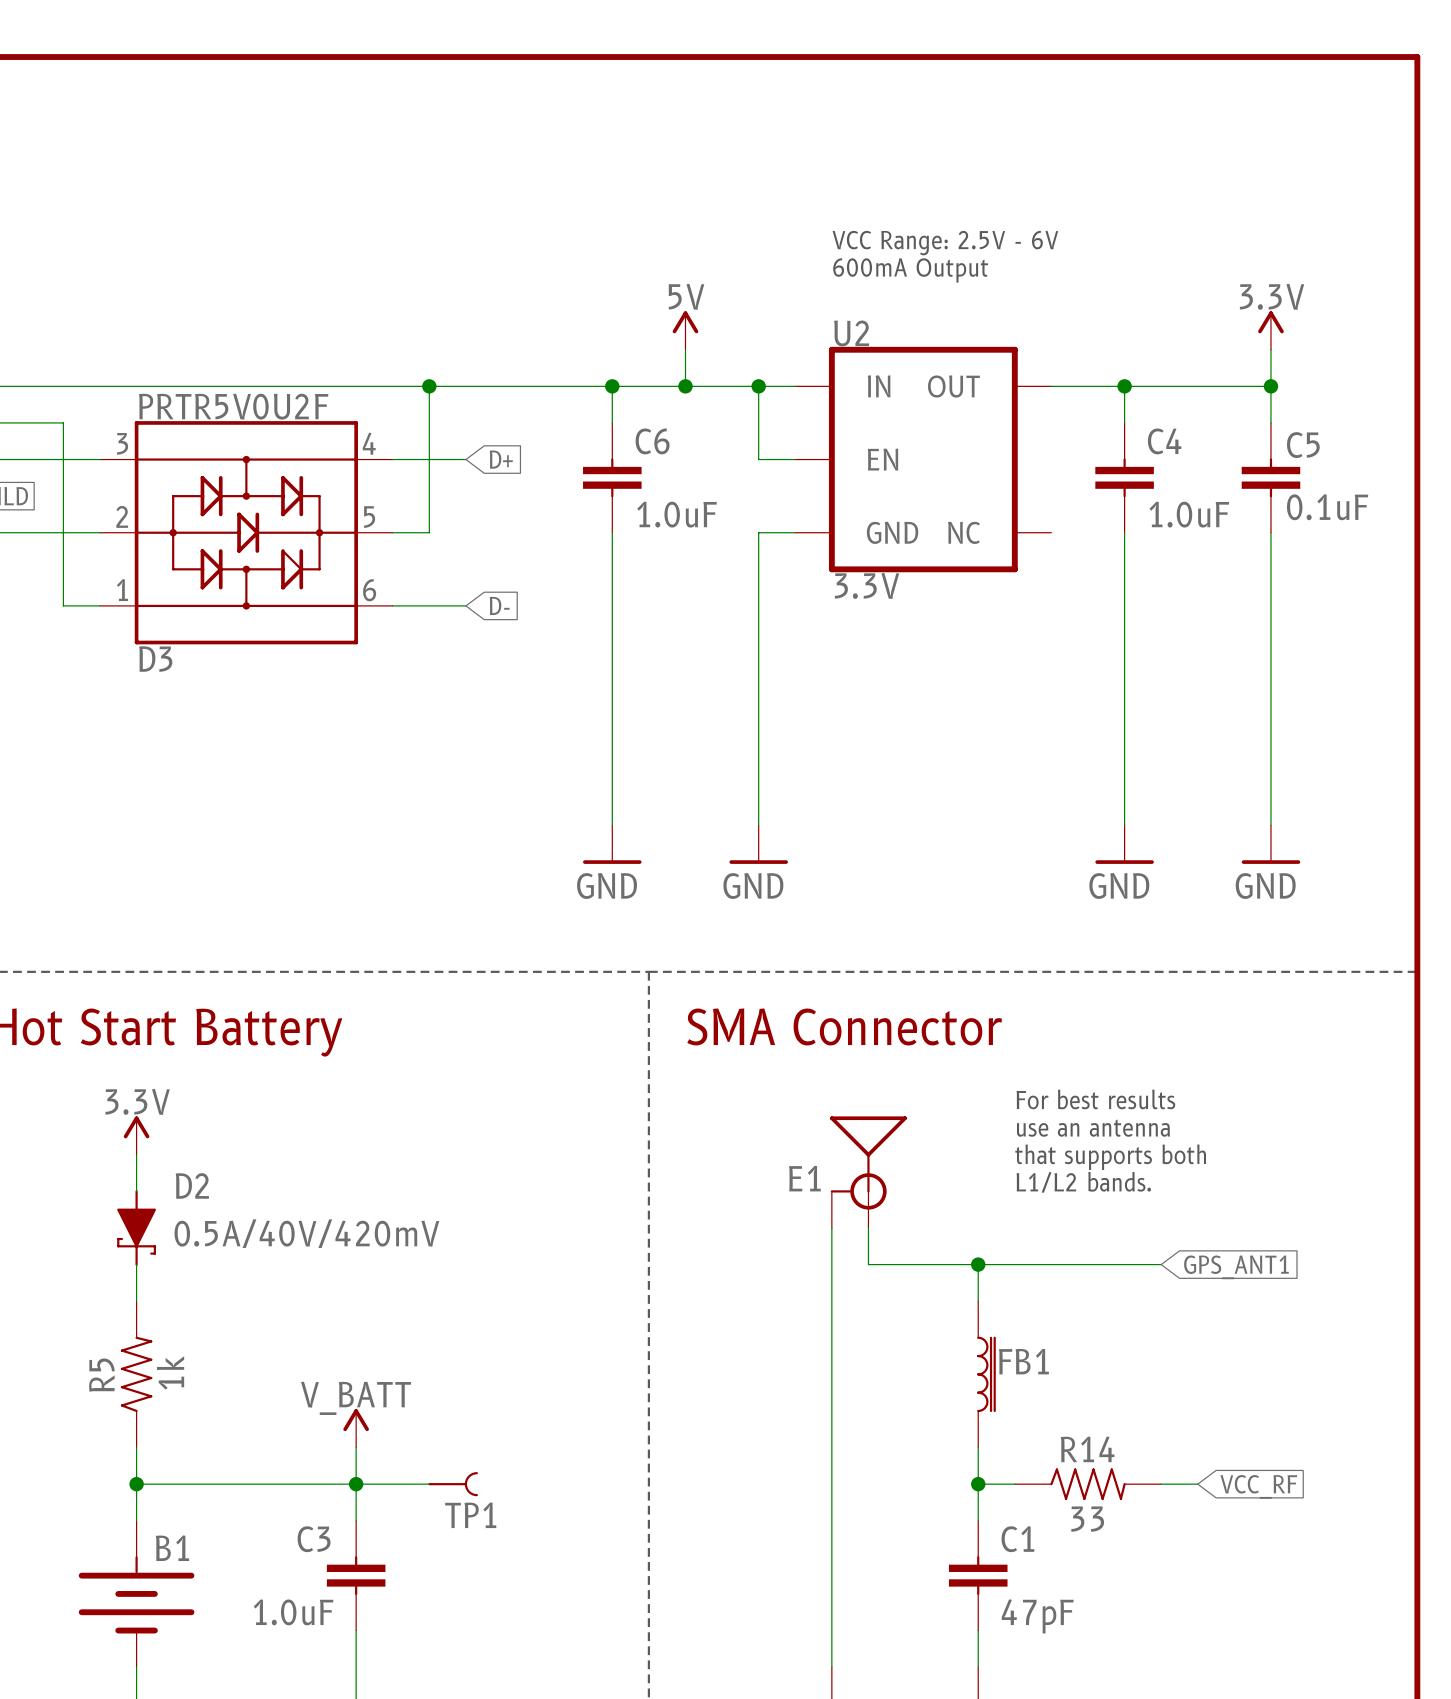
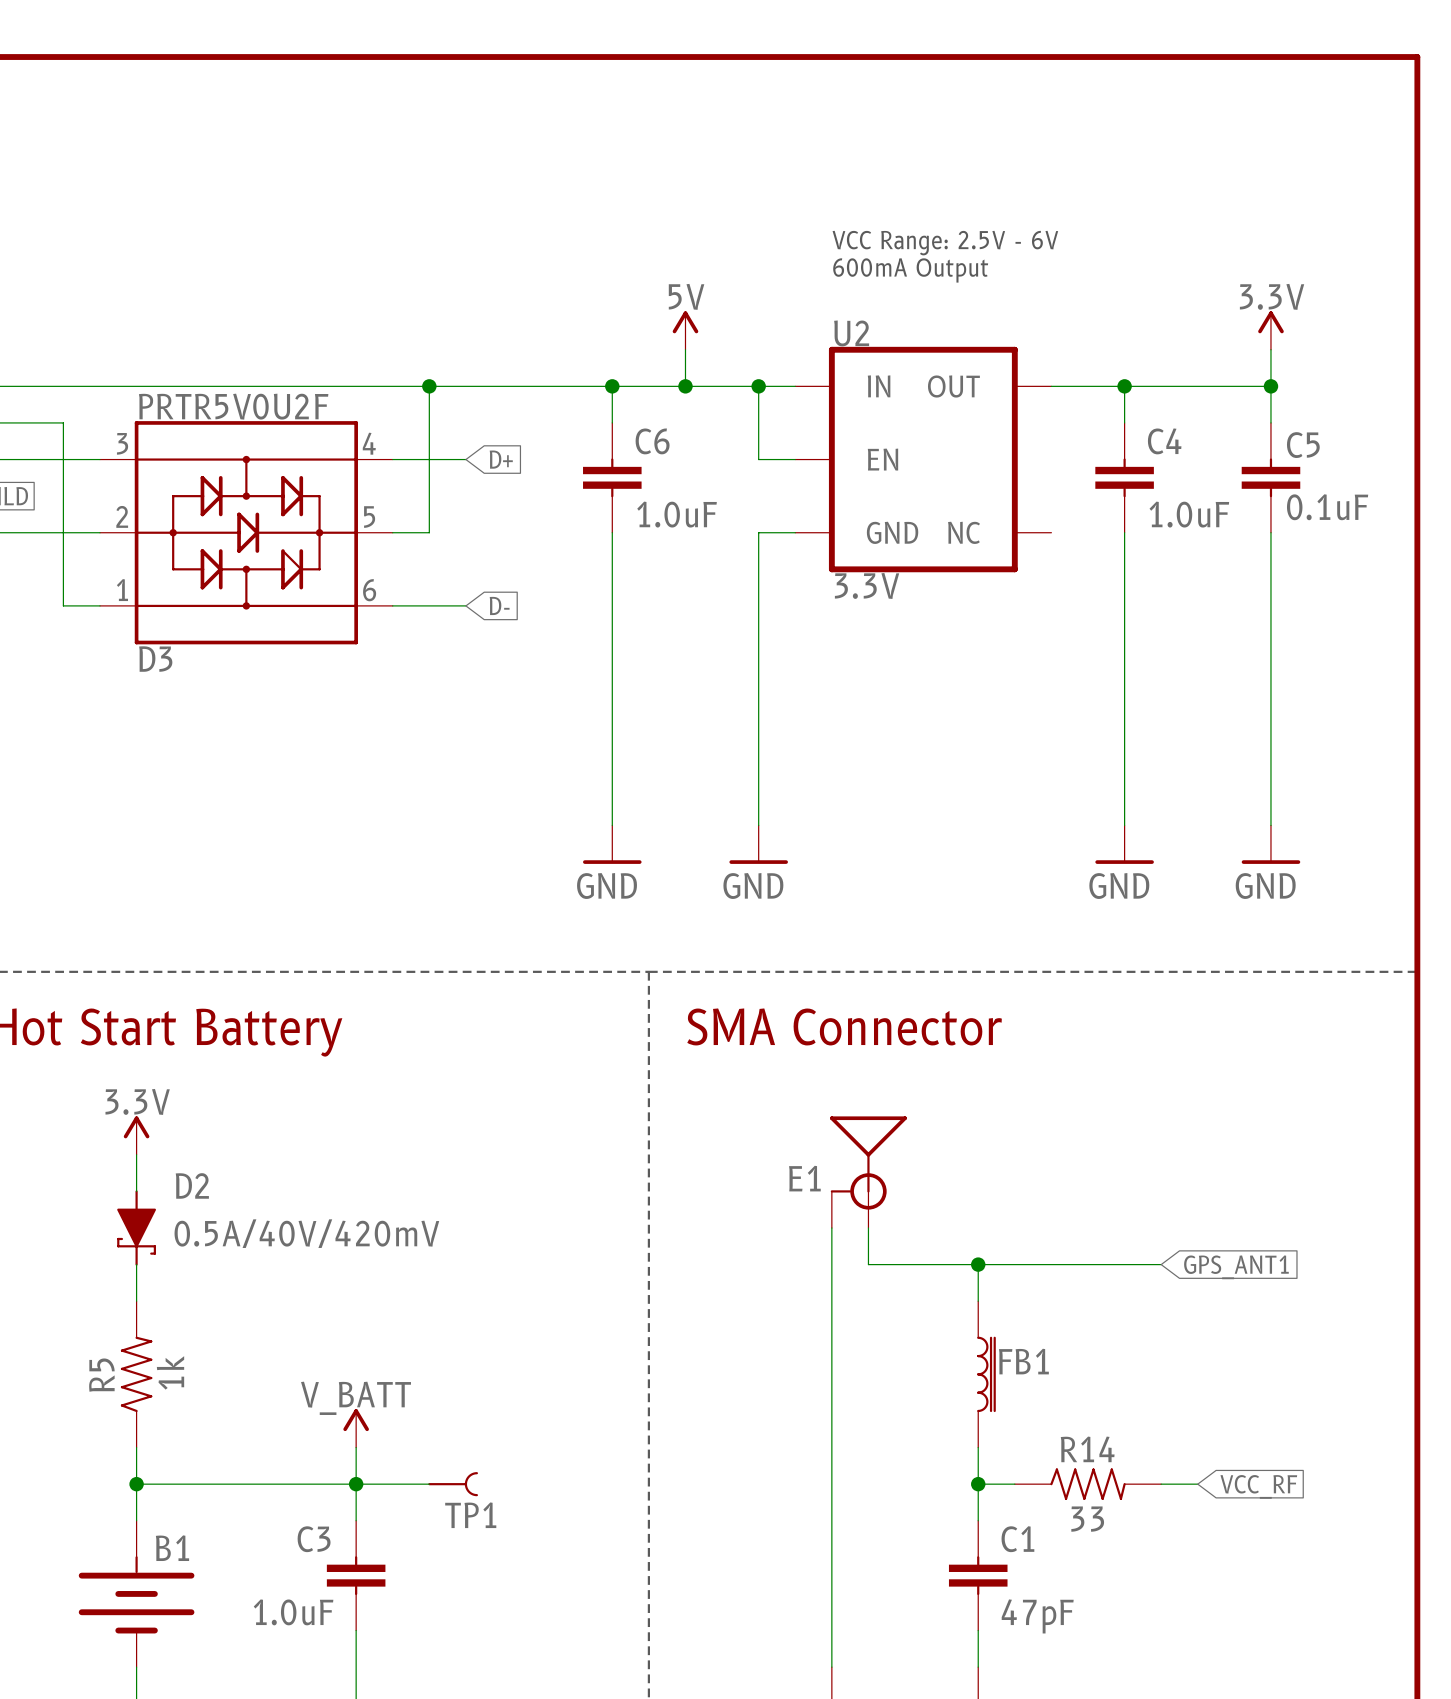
text: For best results (1095, 1099) -> none
text: use an antenna (1093, 1128) -> none
text: that supports both (1110, 1157) -> none
text: L1/L2 bands. (1083, 1182) -> none

